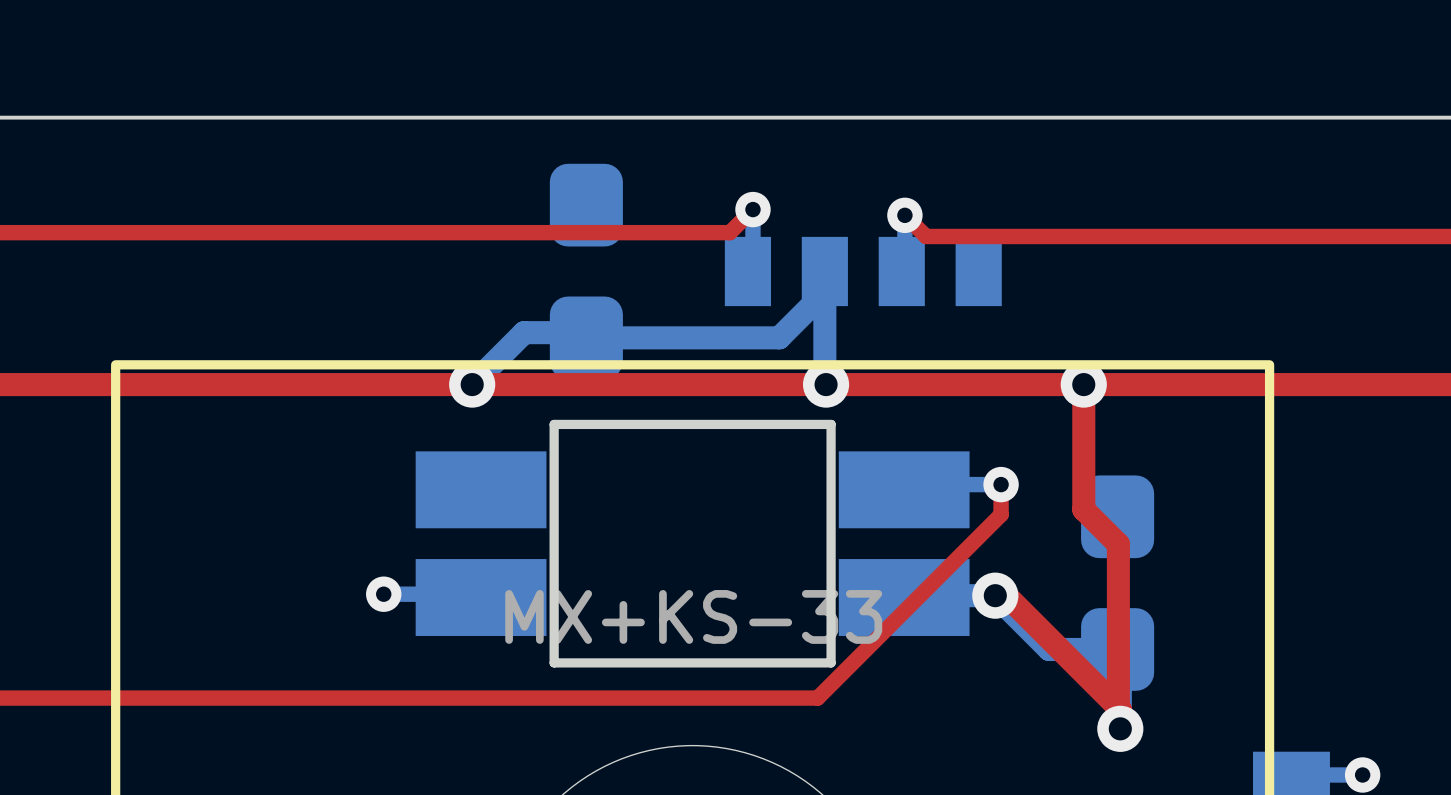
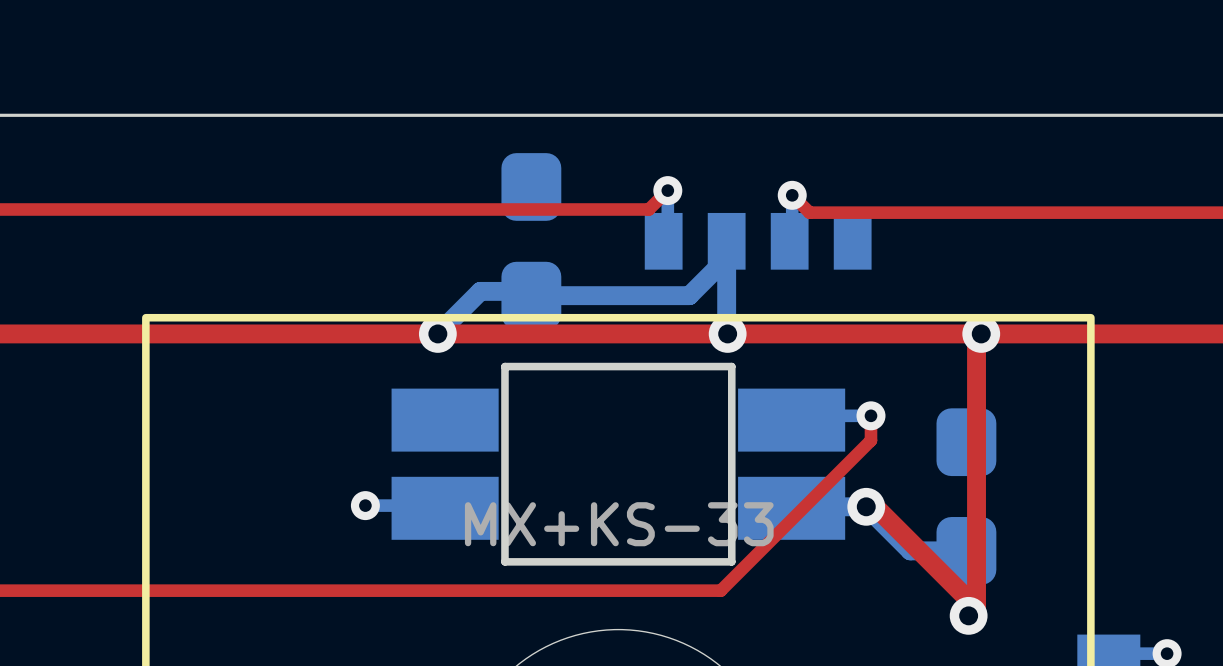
top track: (1083, 382) (1083, 509) (1118, 544) (1118, 726) (1120, 728) -> (979, 332) (981, 333) (976, 338) (976, 607) (968, 615)
via position: (1083, 384) -> (981, 333)

